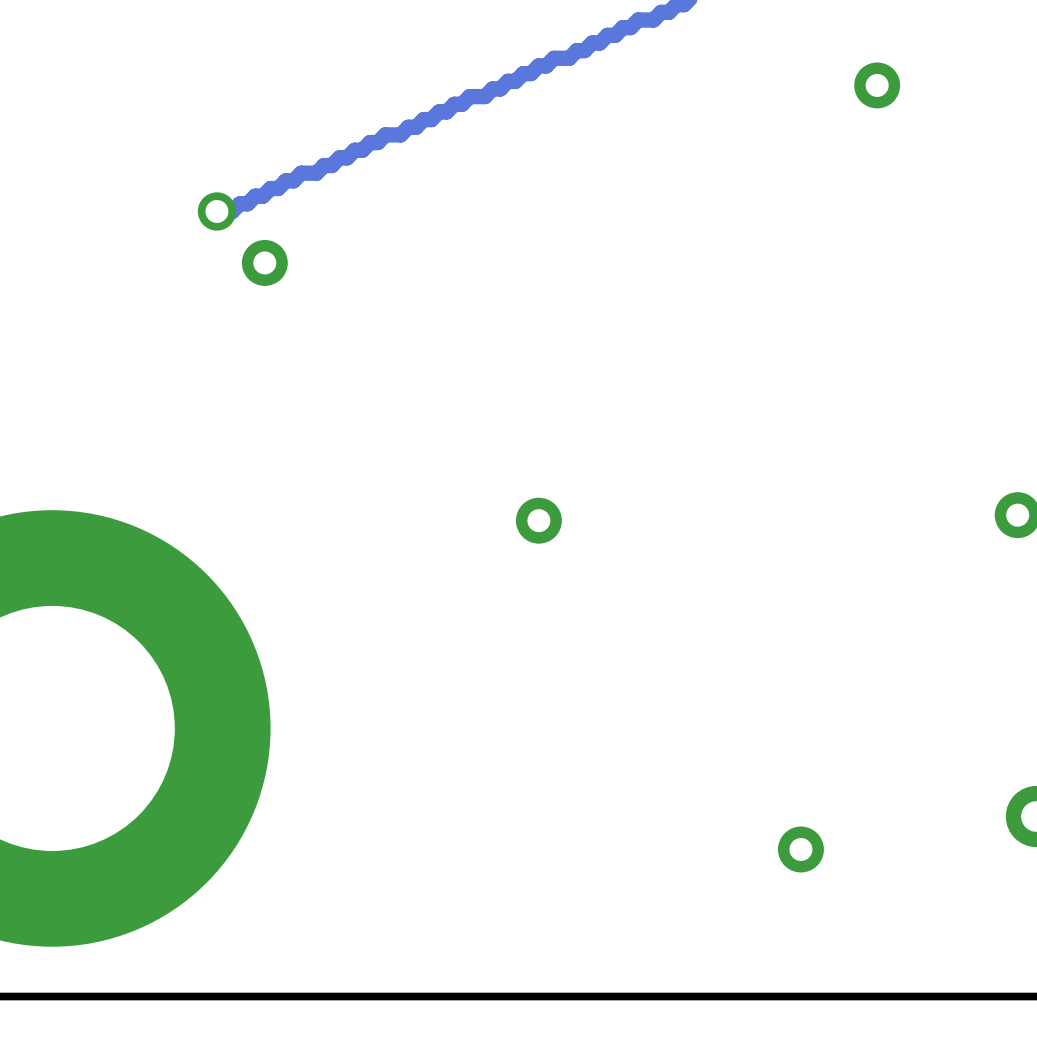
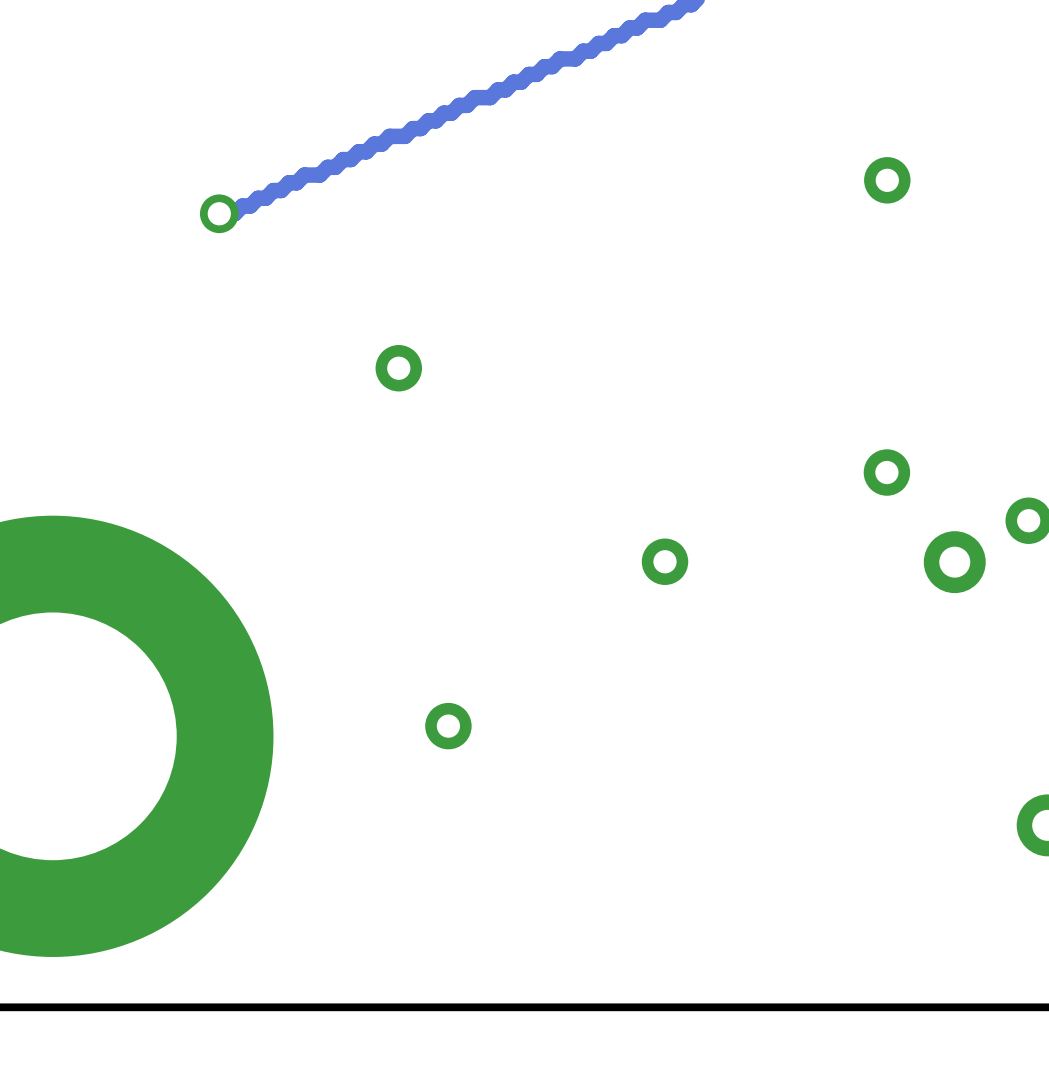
via position: (877, 85) -> (887, 180)
via: (264, 262) -> none
via: none -> (398, 368)
via: none -> (886, 472)
via: (538, 520) -> none
via: none -> (665, 561)
via: none -> (954, 562)
via: none -> (448, 726)
via: (800, 849) -> none

